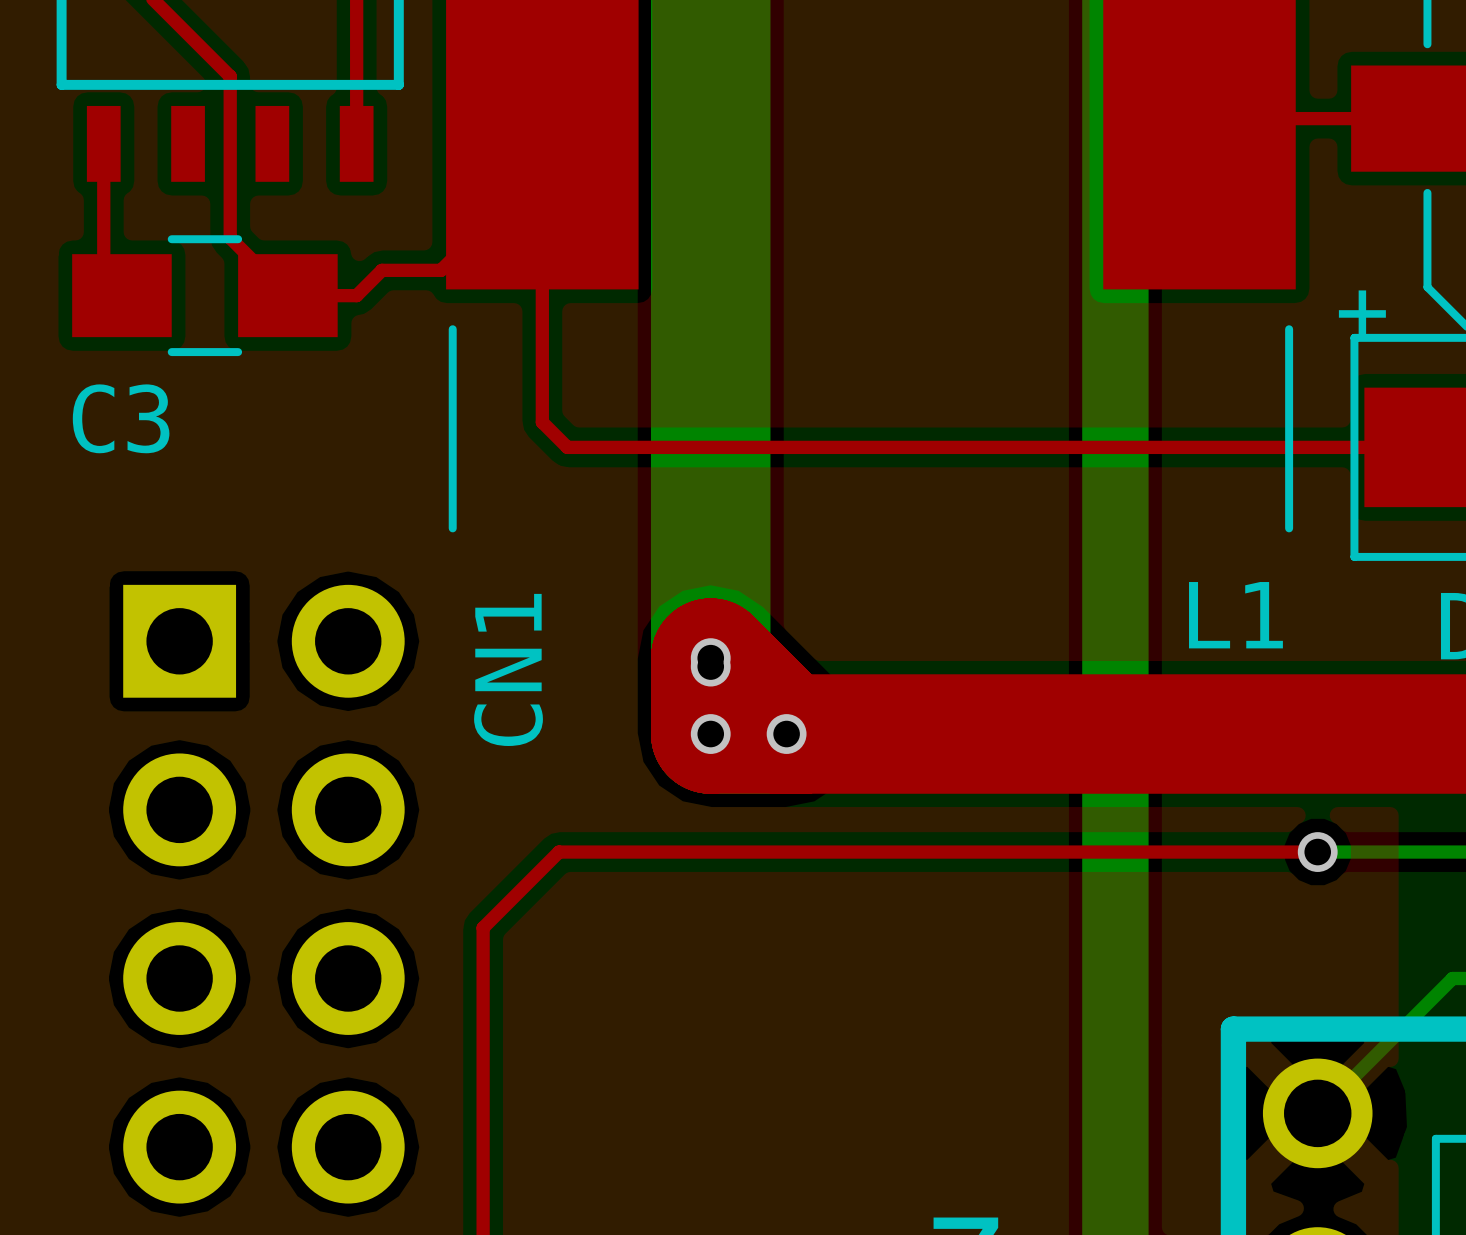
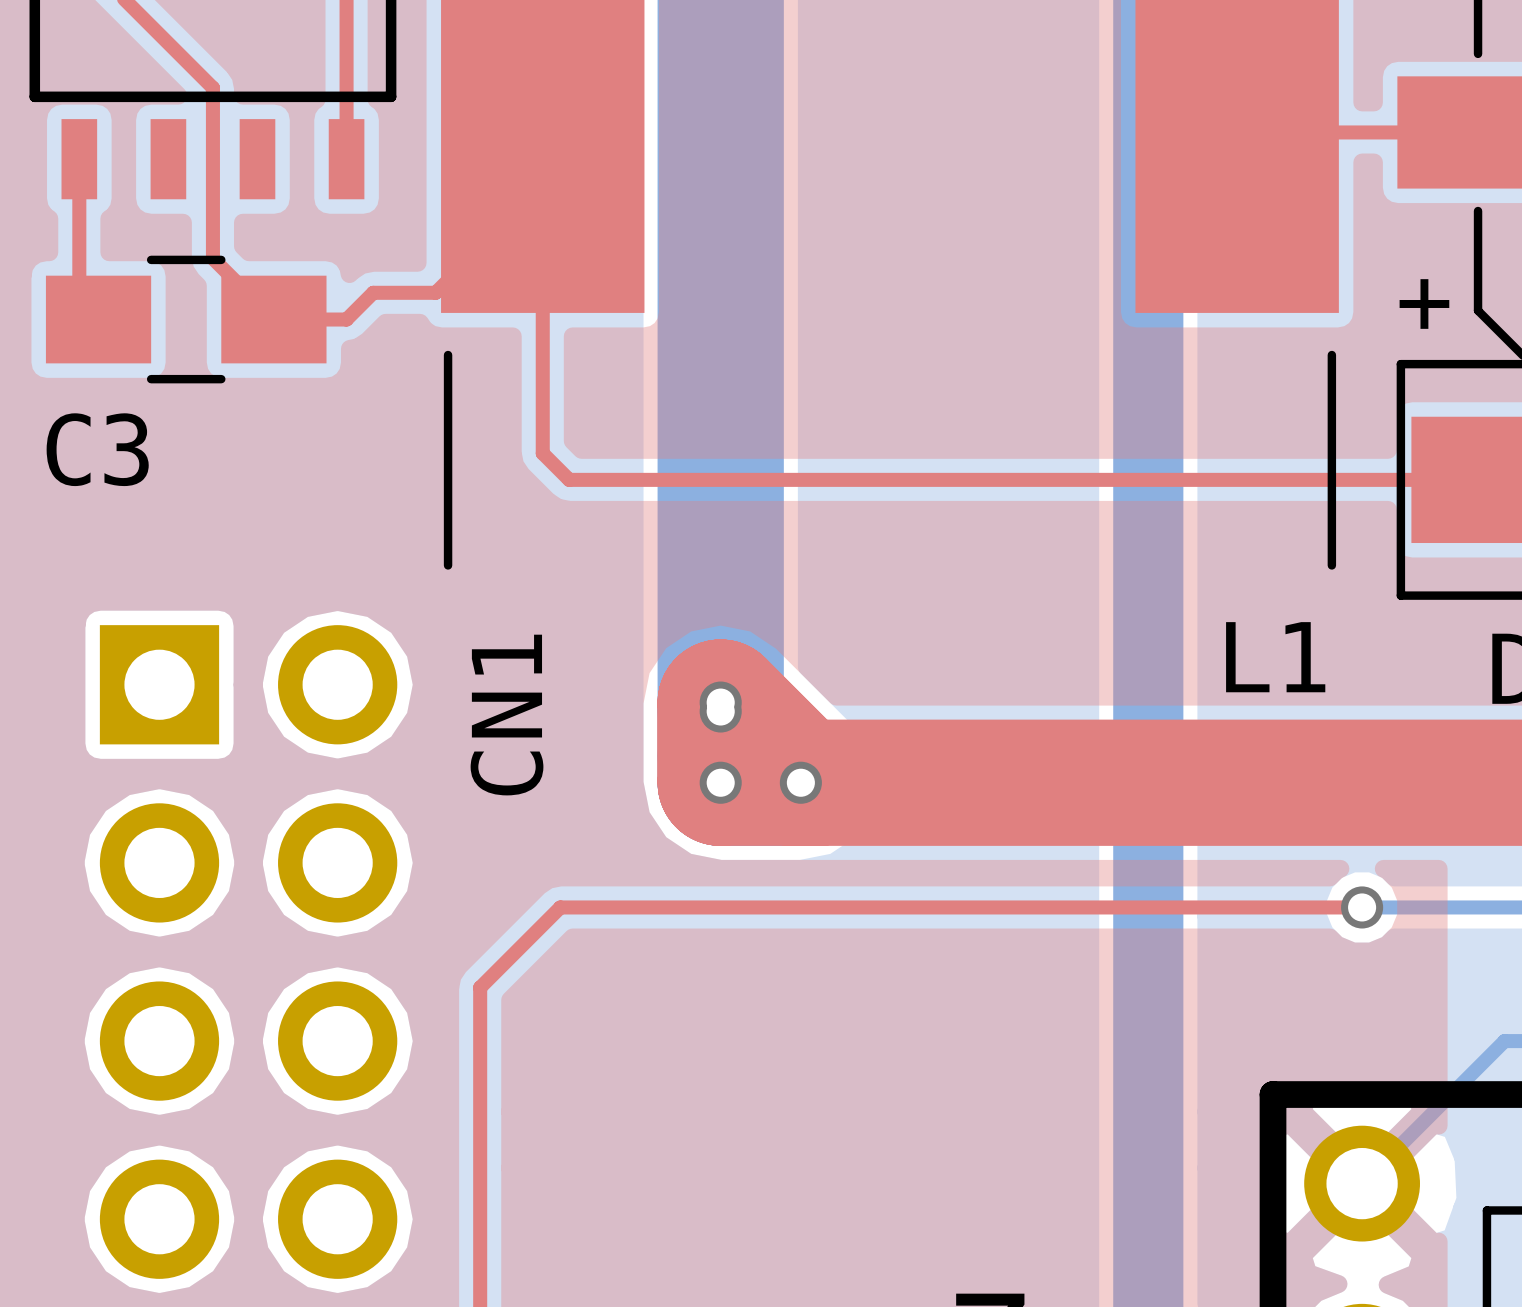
part text position: + (1362, 313) -> + (1424, 304)

